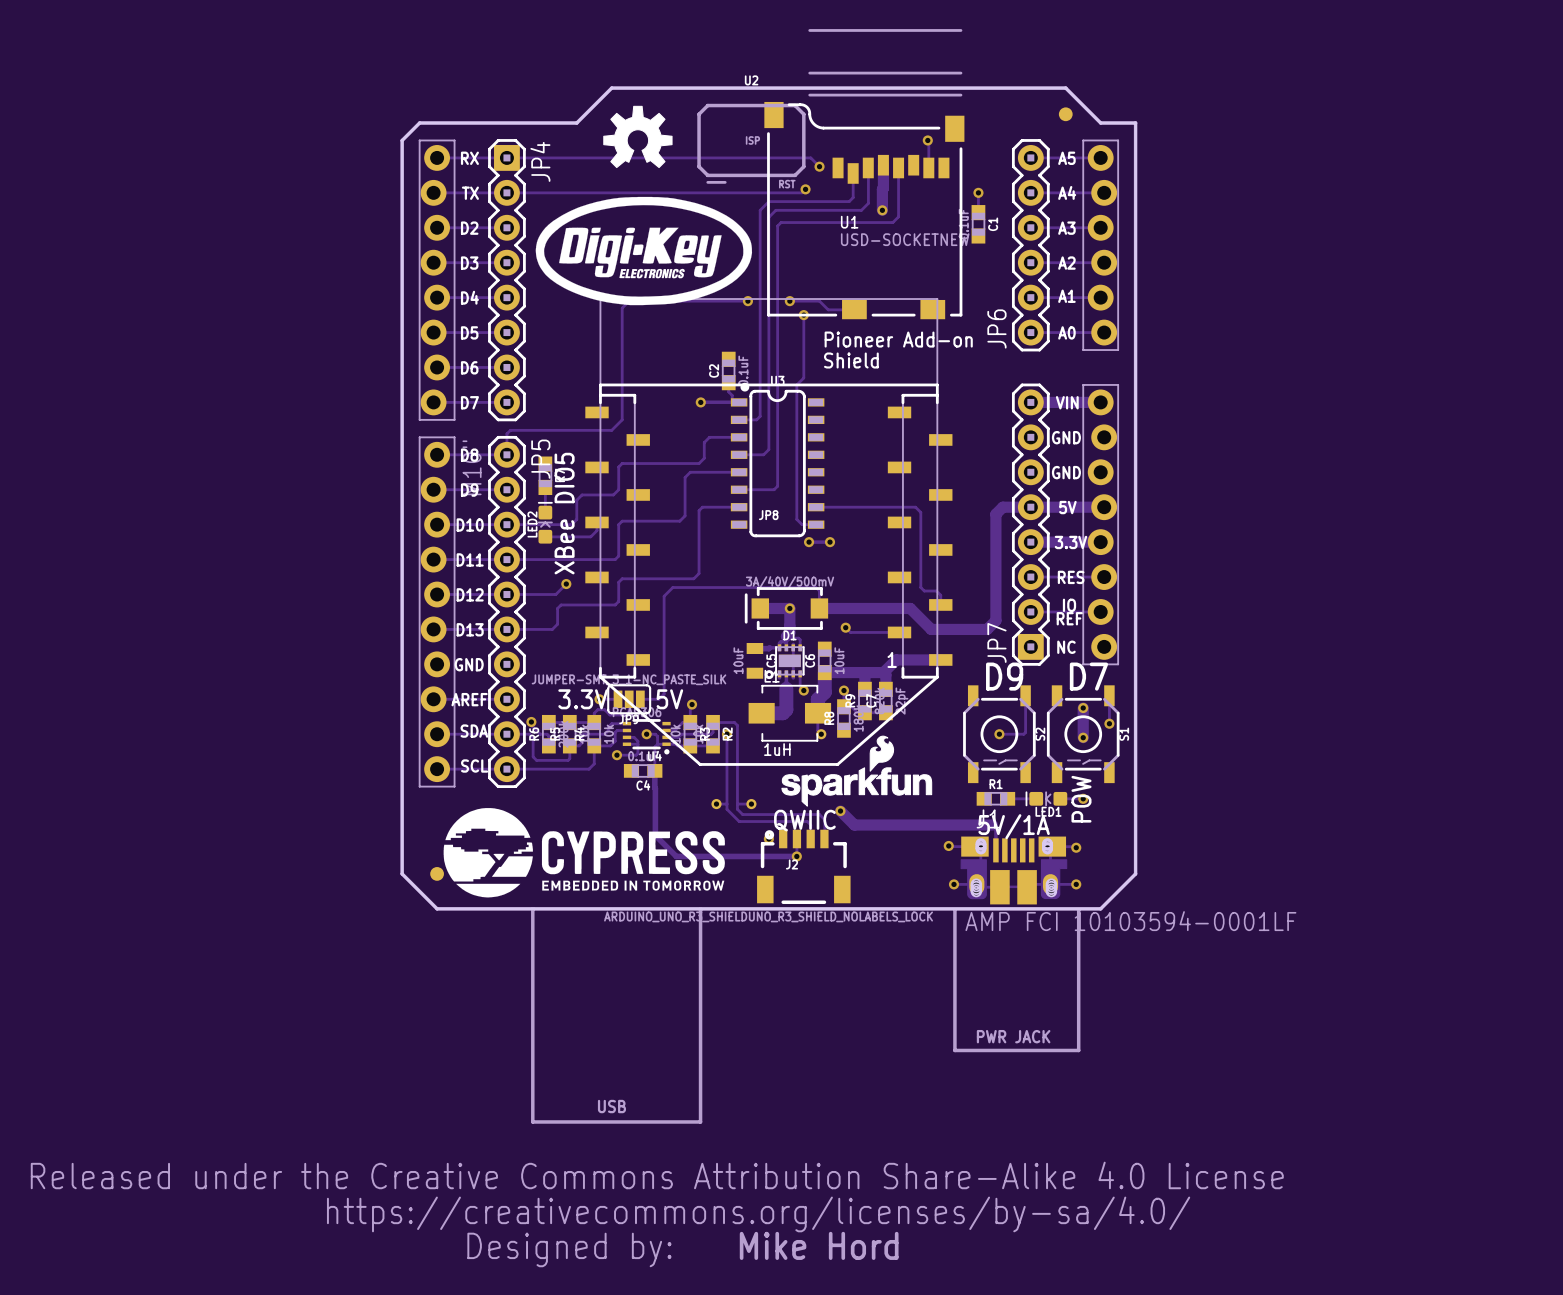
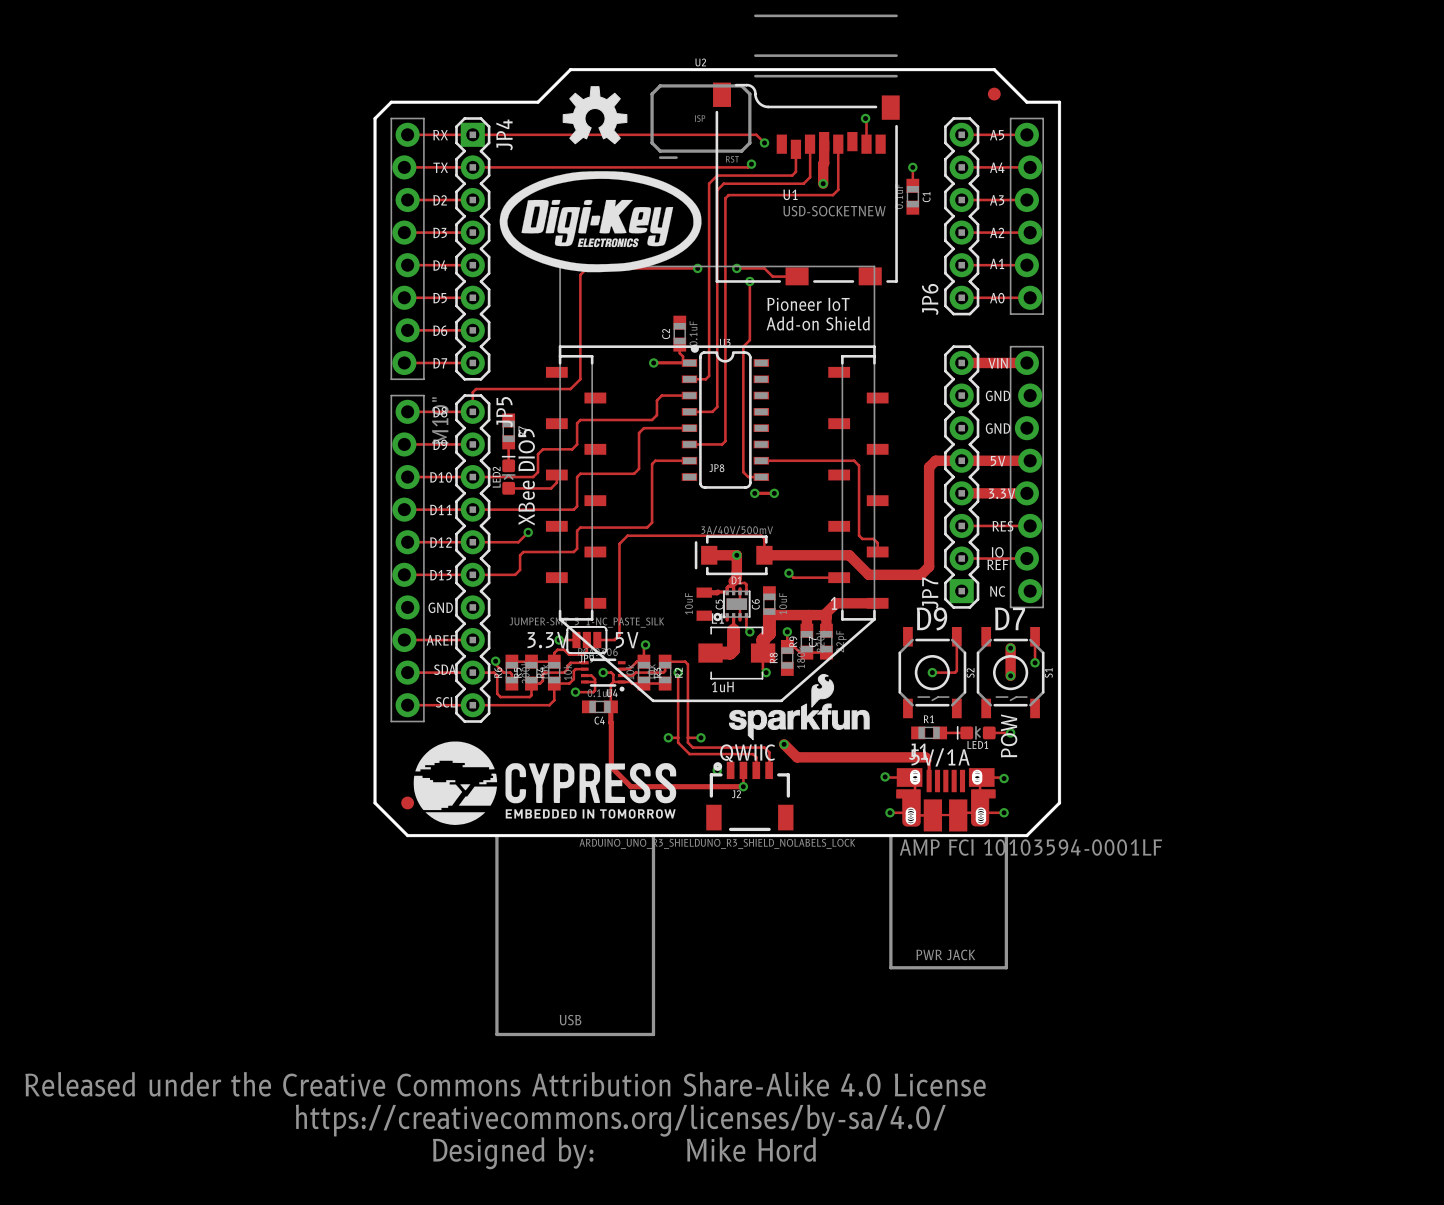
text: Pioneer Add-on (898, 339) -> Pioneer IoT (808, 304)
text: Shield (851, 360) -> Add-on Shield (818, 323)

